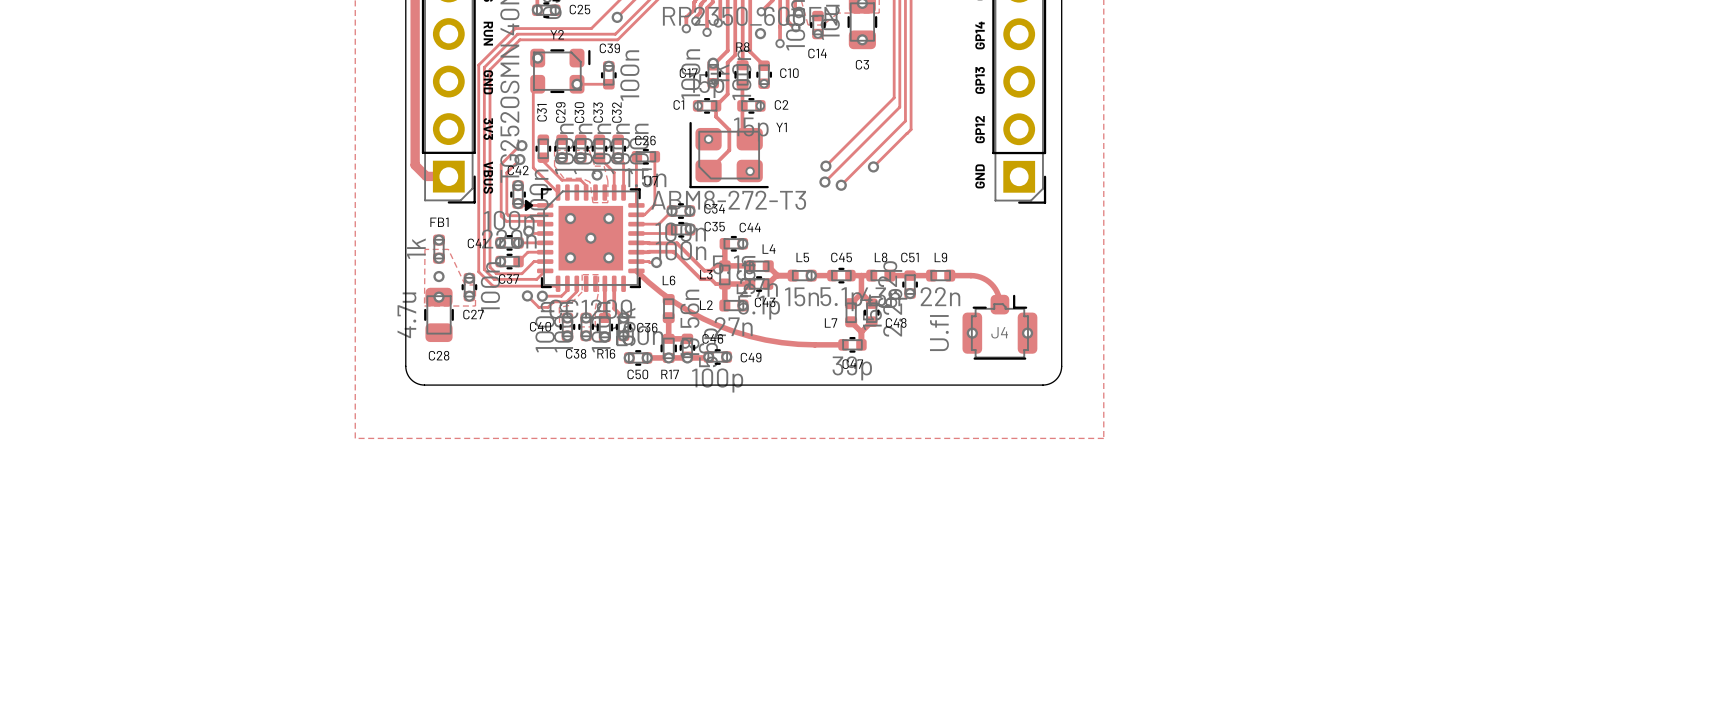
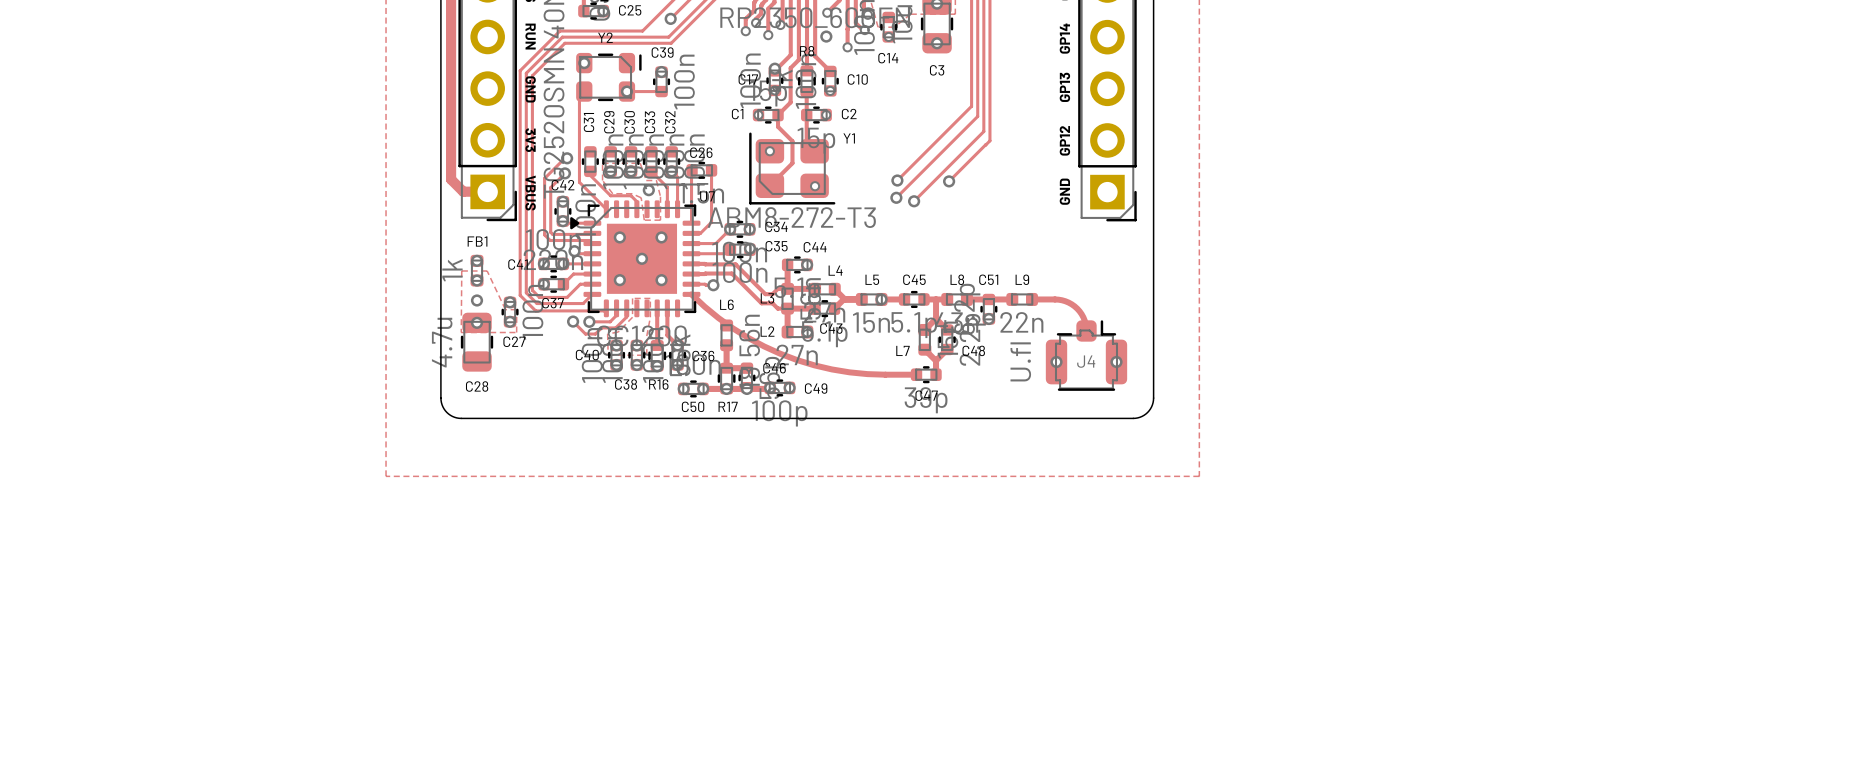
via: (537, 9) -> none

